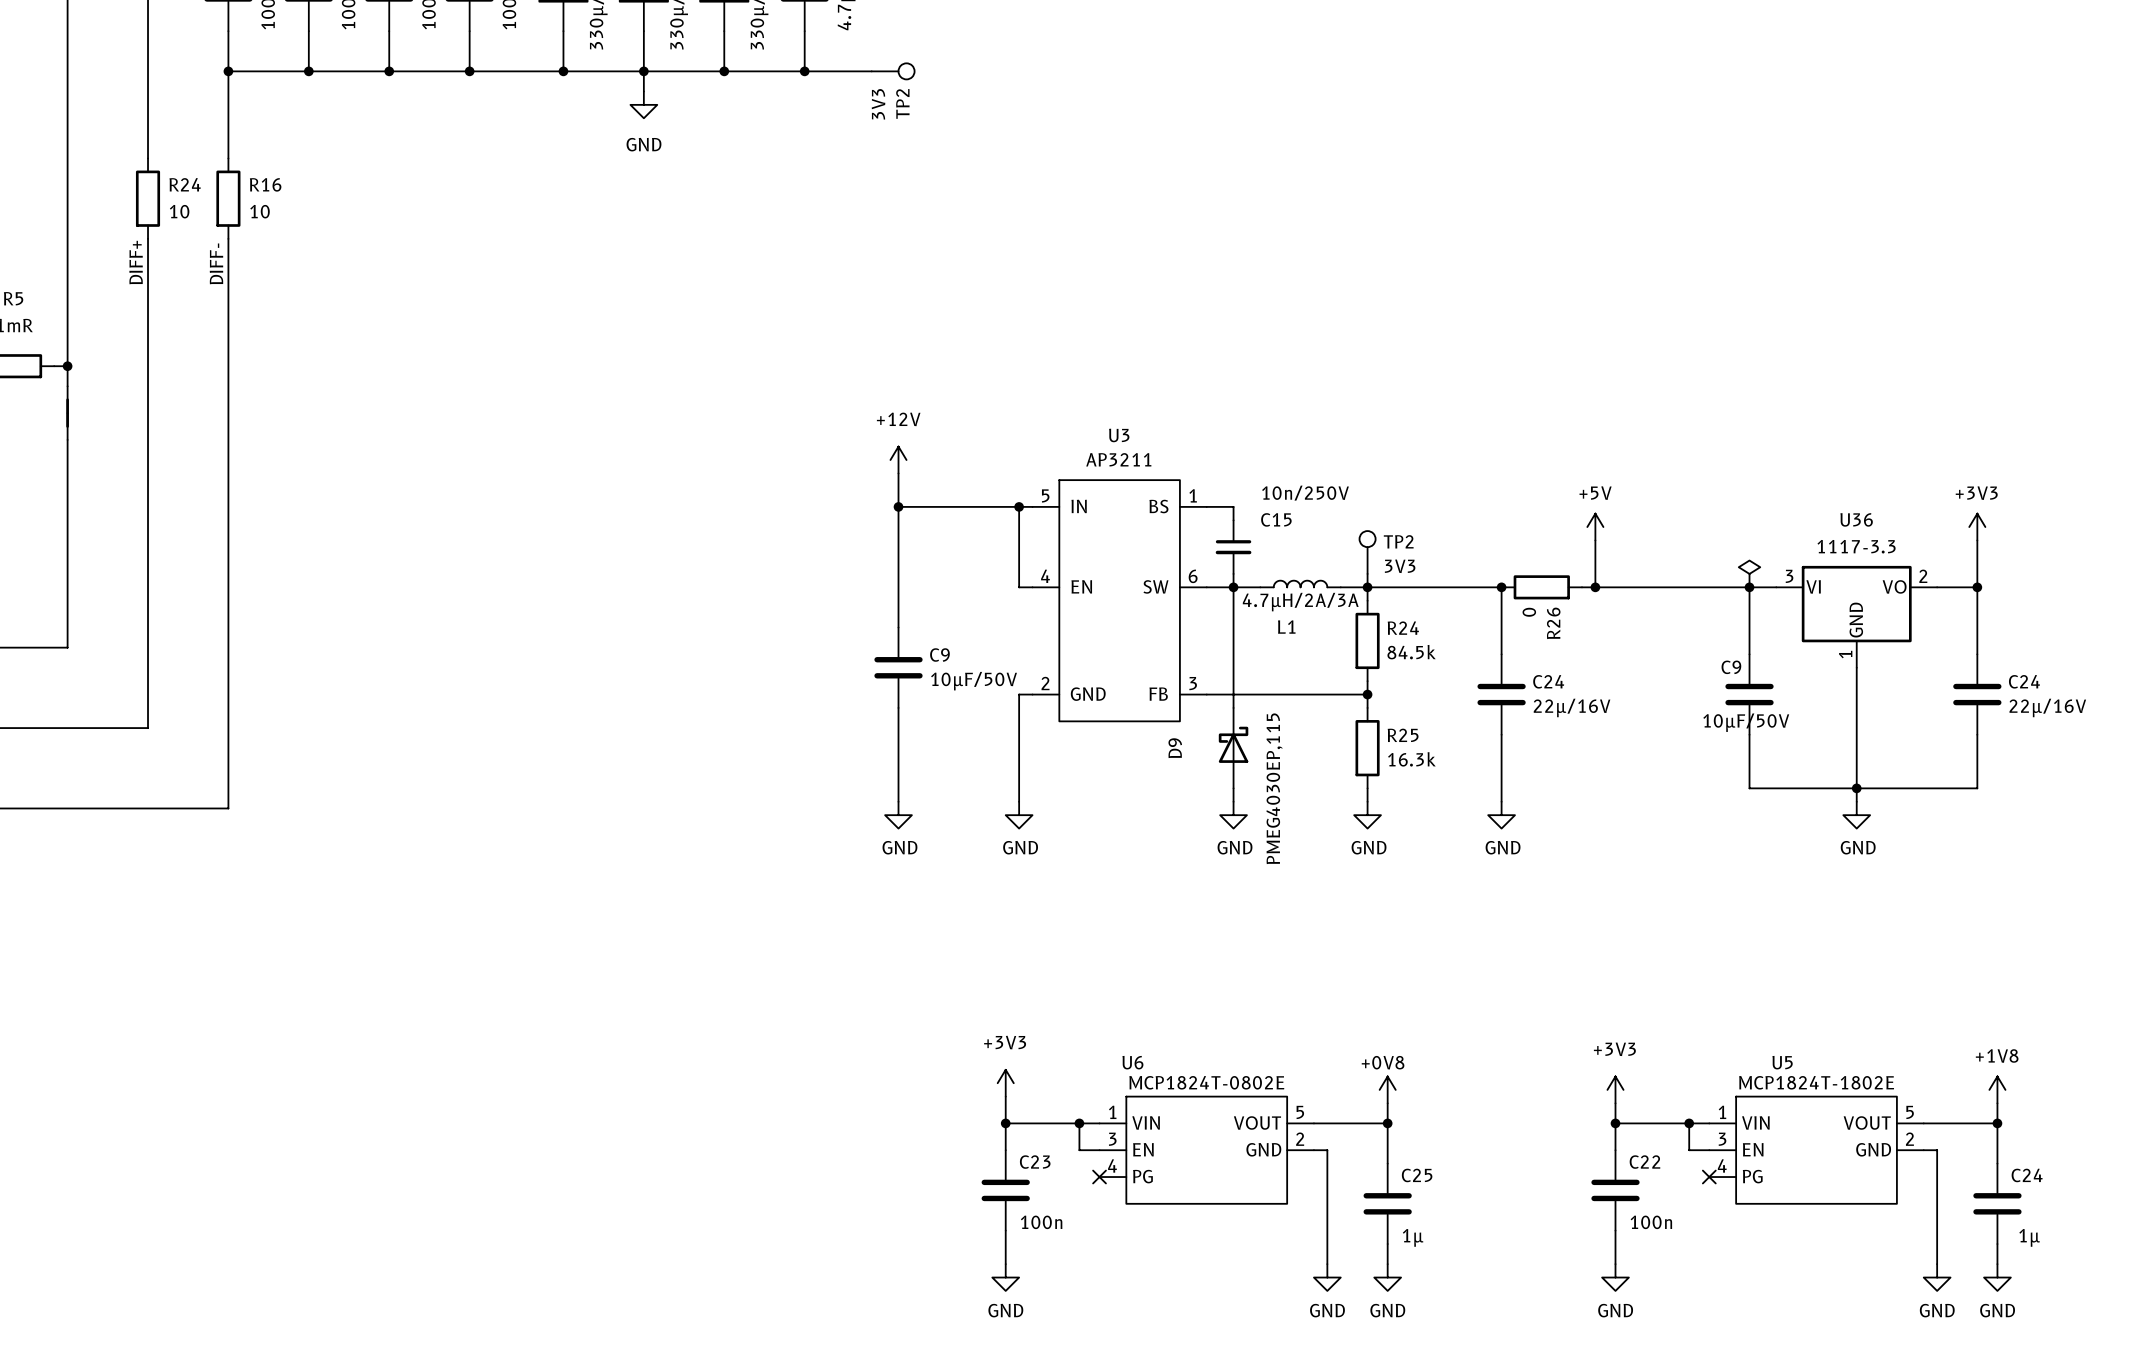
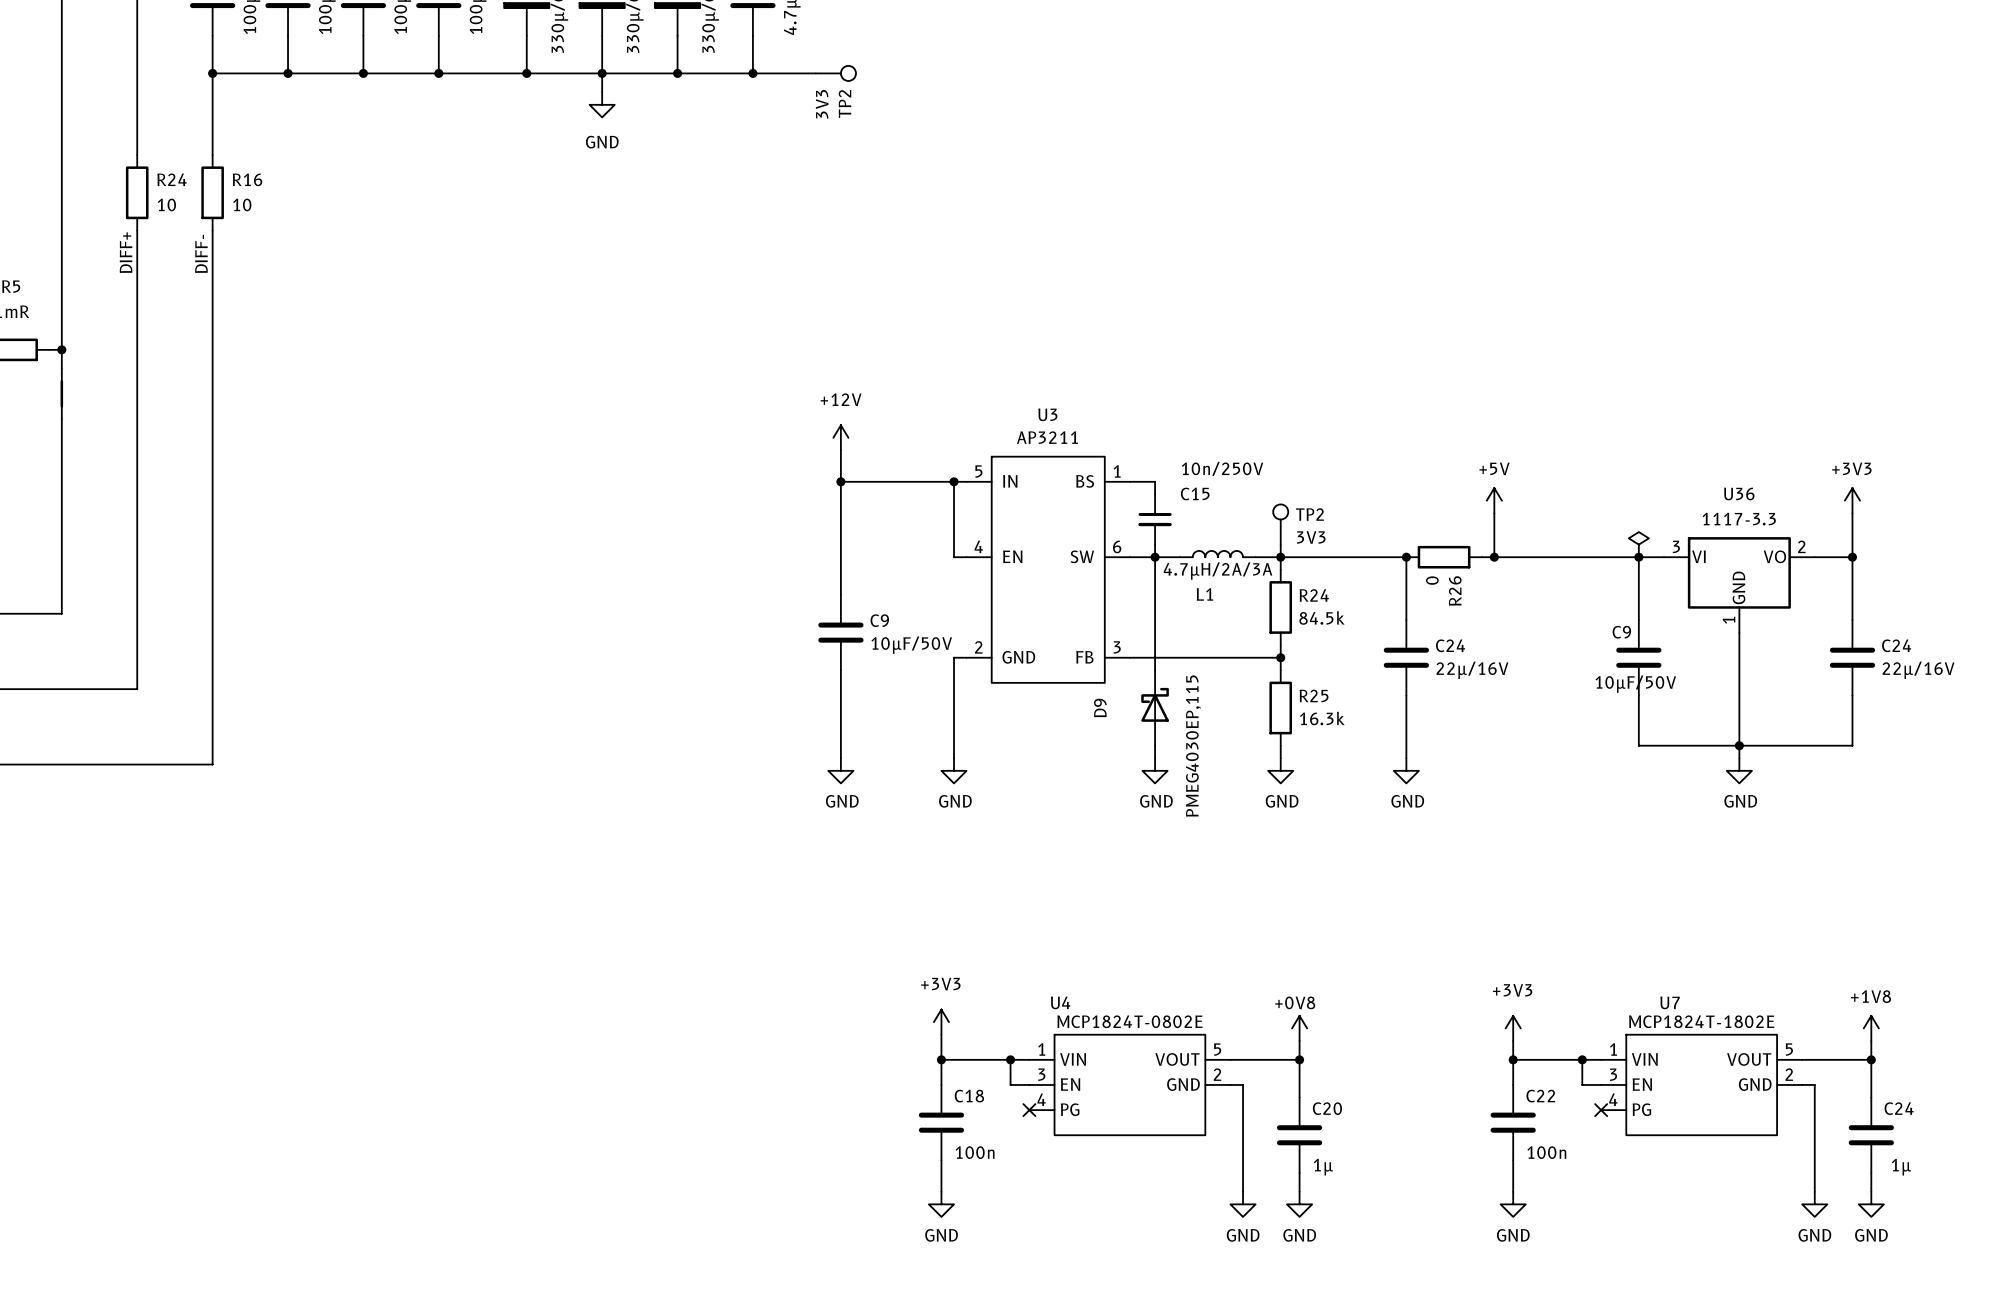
U6 name: U6 (1132, 1062) -> U4 (1060, 1002)
U5 name: U5 (1782, 1062) -> U7 (1670, 1002)
C23 name: C23 (1035, 1162) -> C18 (969, 1096)
C25 name: C25 (1417, 1175) -> C20 (1327, 1108)

